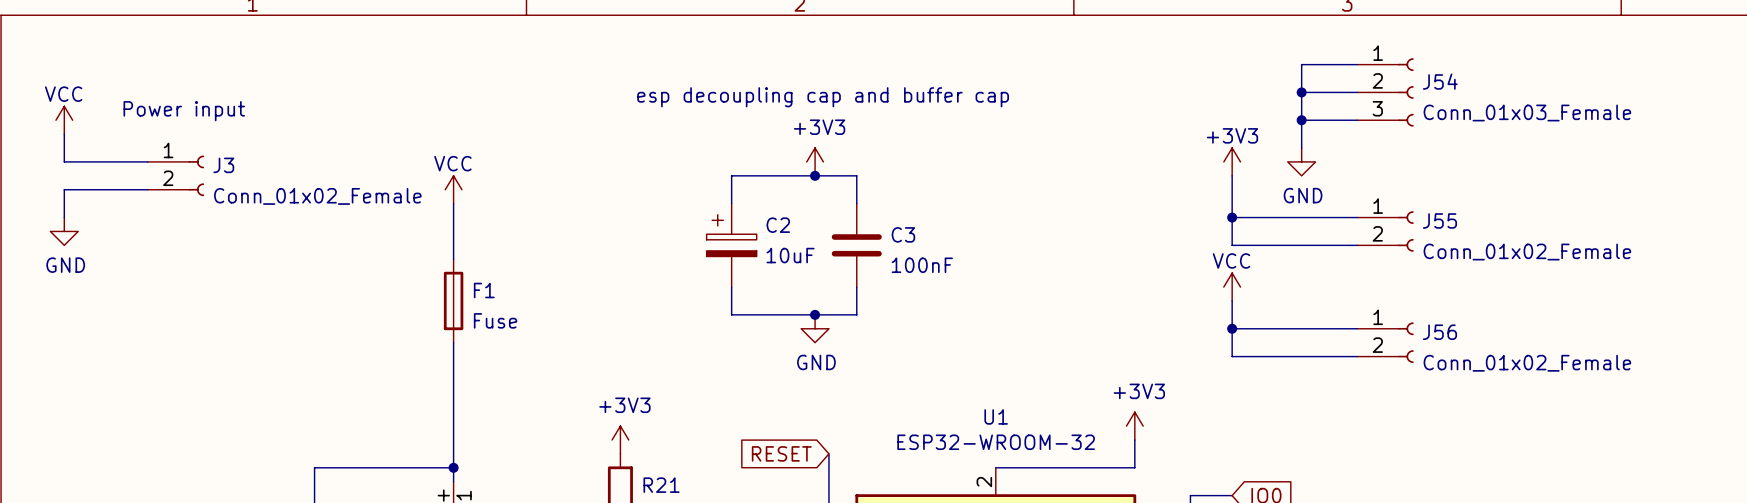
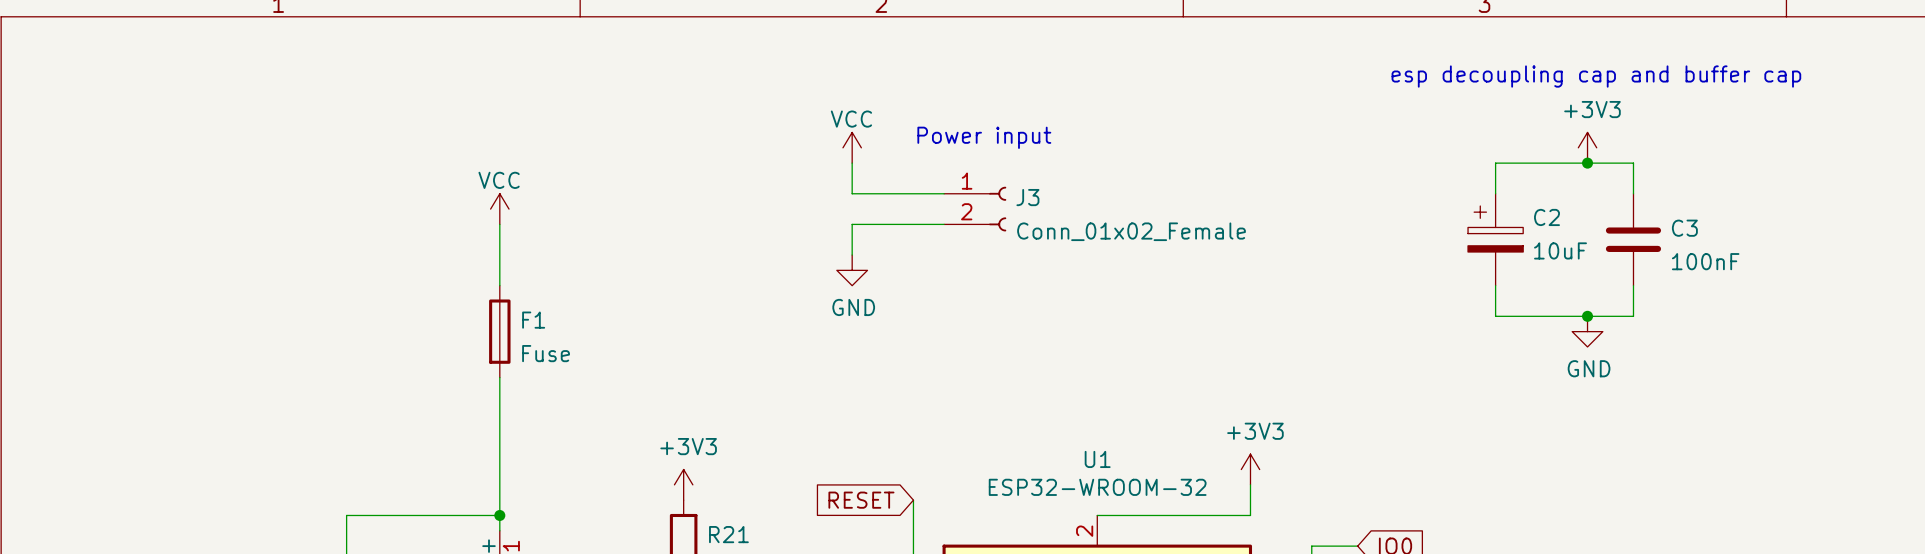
wire: (1357, 64) (1301, 64) (1301, 148) -> none
text: none -> esp decoupling cap and buffer cap (1596, 76)
wire: (1301, 92) (1357, 92) -> none
junction: (1301, 92) -> none
J54: Conn_01x03_Female (1385, 92) -> none
text: esp decoupling cap and buffer cap (823, 97) -> none
text: Power input (184, 111) -> none
power symbol: VCC (64, 120) -> none
wire: (1301, 120) (1357, 120) -> none
junction: (1301, 120) -> none
text: none -> Power input (984, 137)
wire: (64, 134) (64, 161) (147, 161) -> none
power symbol: none -> VCC (852, 147)
power symbol text position: +3V3 (1232, 135) -> +3V3 (1592, 109)
junction: none -> (1587, 163)
power symbol: +3V3 (815, 161) -> none
power symbol position: +3V3 (1232, 161) -> +3V3 (1587, 147)
power symbol position: GND (1301, 161) -> GND (1587, 331)
J3 position: (175, 175) -> (975, 209)
wire: (773, 175) (731, 175) (731, 203) -> (852, 193) (852, 163)
junction: (815, 175) -> none
wire: (856, 175) (856, 203) -> (852, 255) (852, 224) (944, 224)
wire: (1232, 175) (1232, 245) (1357, 245) -> none
wire: none -> (1495, 193) (1495, 163) (1633, 163) (1633, 193)
wire: (147, 189) (64, 189) (64, 217) -> none
wire: (1232, 217) (1357, 217) -> none
junction: (1232, 217) -> none
power symbol: GND (64, 231) -> none
J55: Conn_01x02_Female (1385, 231) -> none
C2 position: (731, 245) -> (1495, 239)
C3 position: (856, 245) -> (1633, 239)
wire: none -> (1495, 285) (1495, 316) (1633, 316) (1633, 285)
wire: (731, 287) (731, 314) (856, 314) (856, 287) -> none
power symbol: VCC (1232, 287) -> none
junction: none -> (1587, 316)
wire: (1232, 300) (1232, 356) (1357, 356) -> none
junction: (815, 314) -> none
power symbol position: GND (815, 328) -> GND (852, 270)
wire: (1232, 328) (1357, 328) -> none
junction: (1232, 328) -> none
J56: Conn_01x02_Female (1385, 342) -> none

